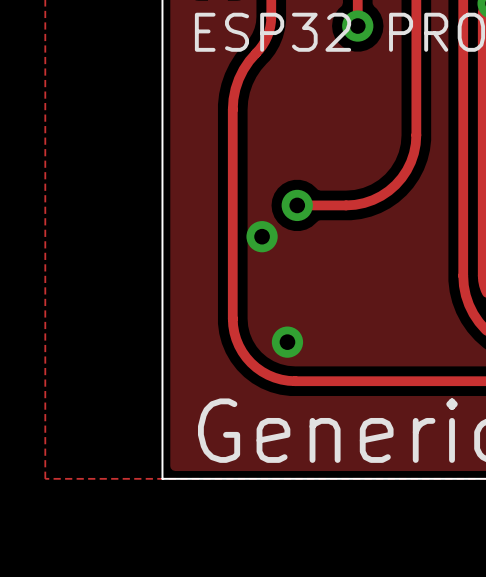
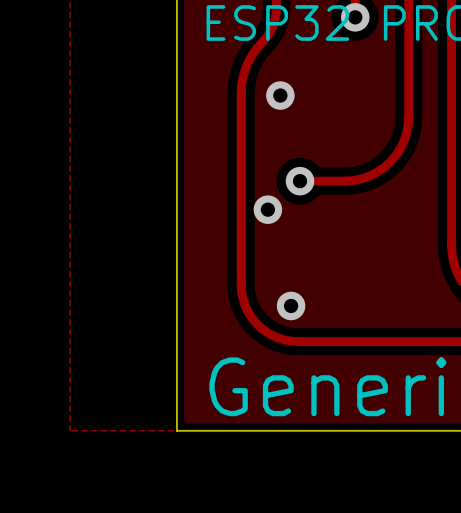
via: none -> (280, 95)

